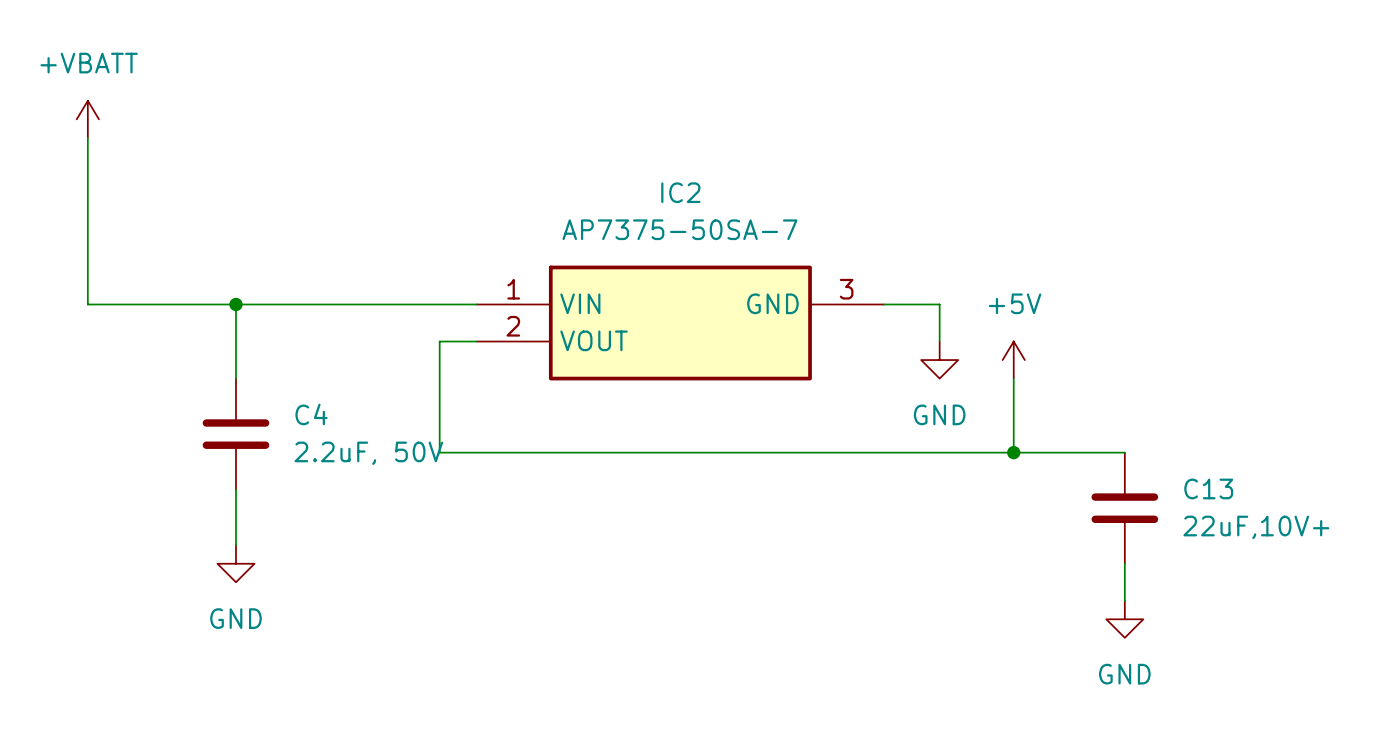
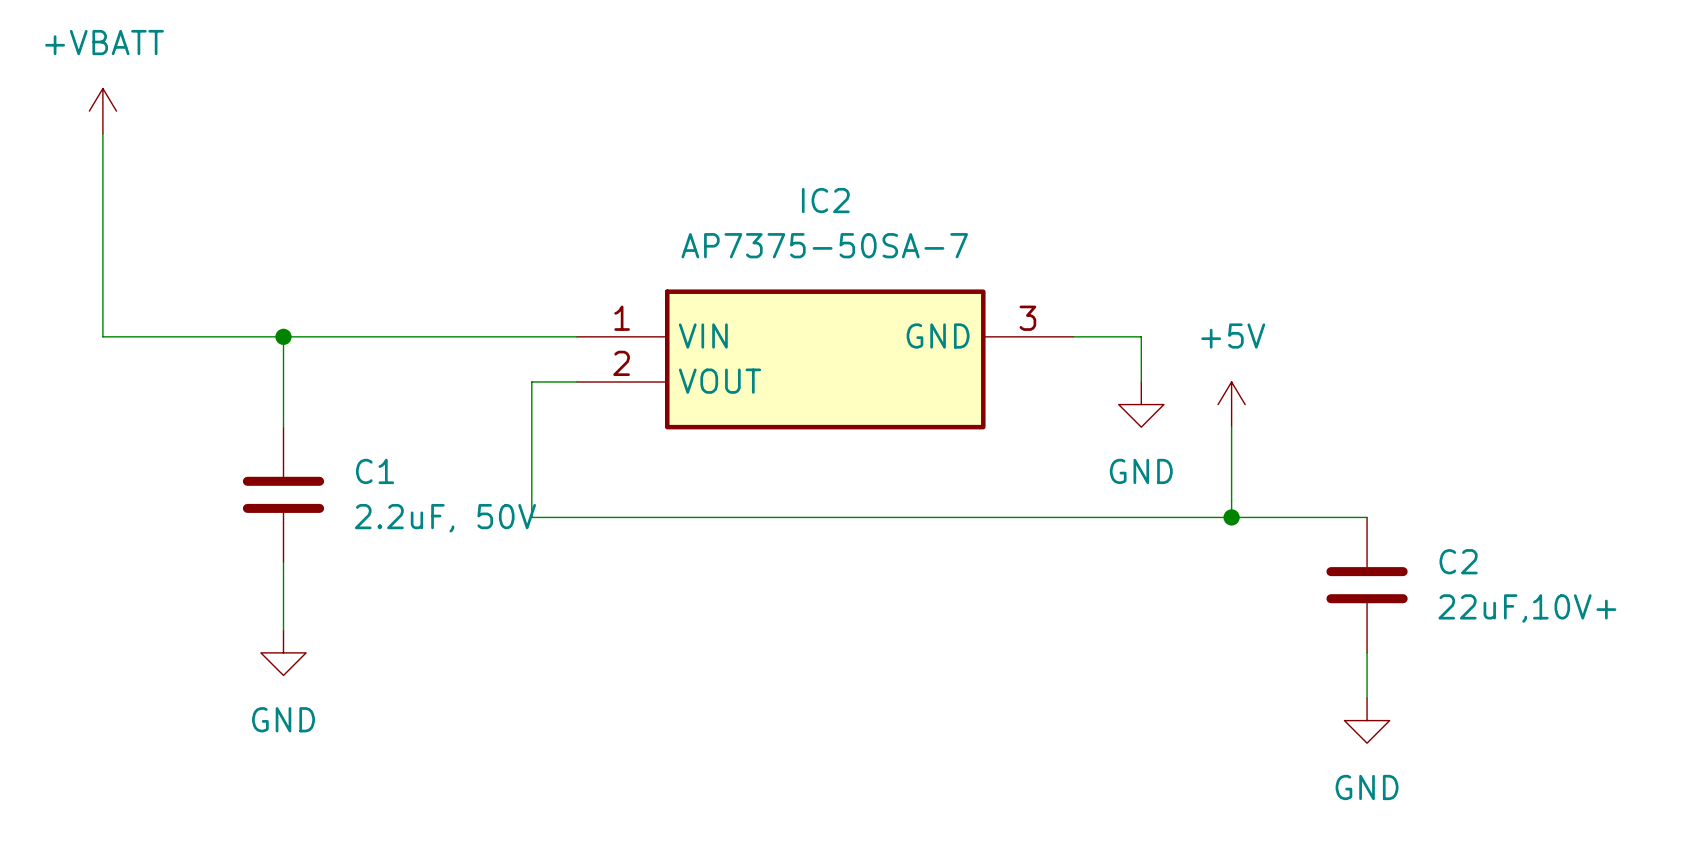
C4 name: C4 (311, 414) -> C1 (375, 471)
C13 name: C13 (1208, 488) -> C2 (1458, 561)

